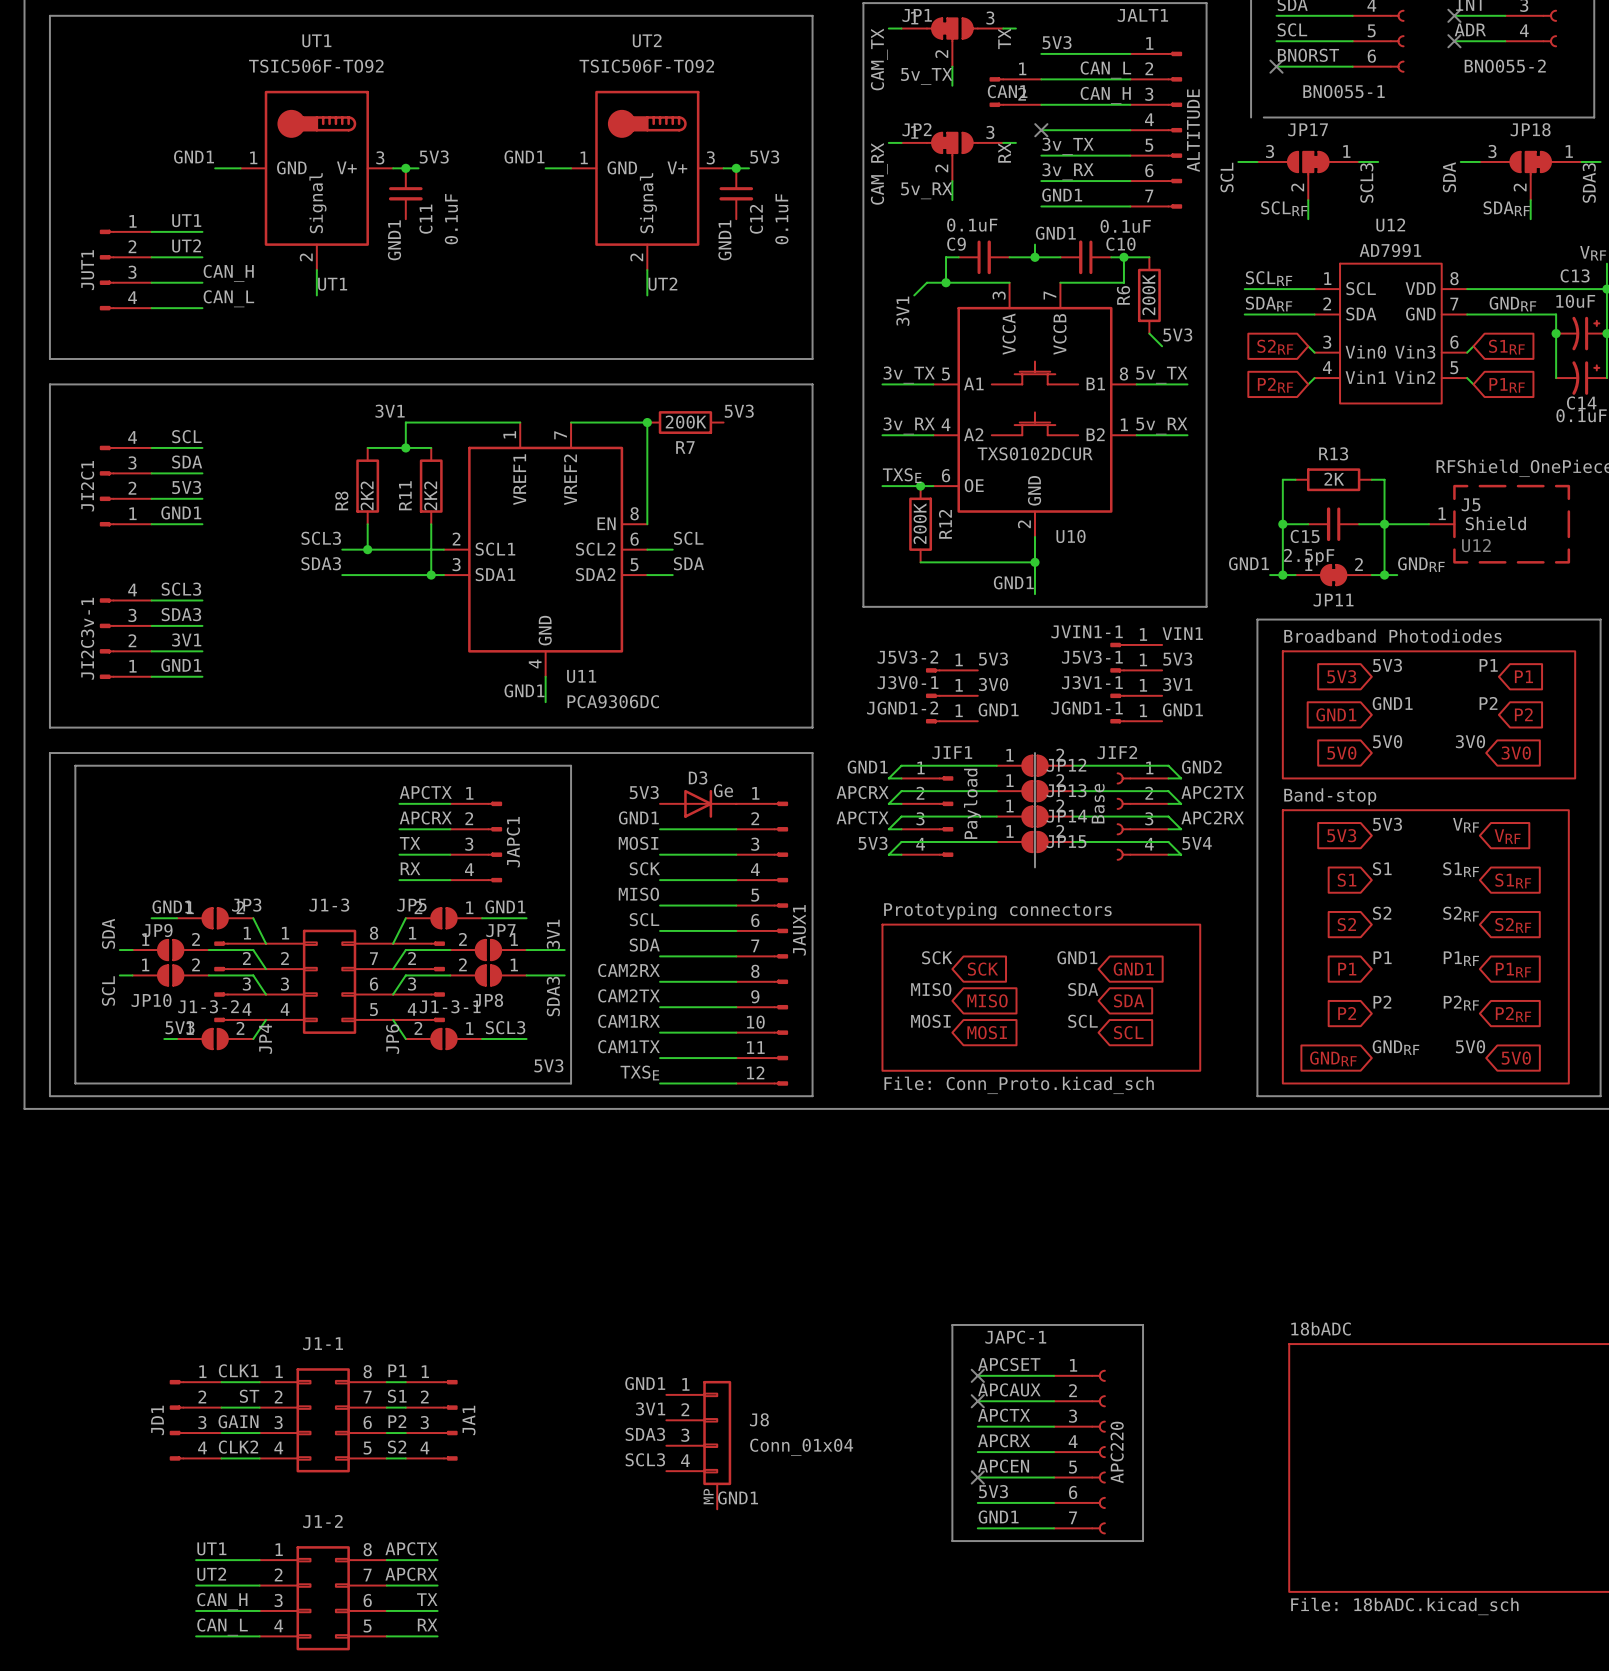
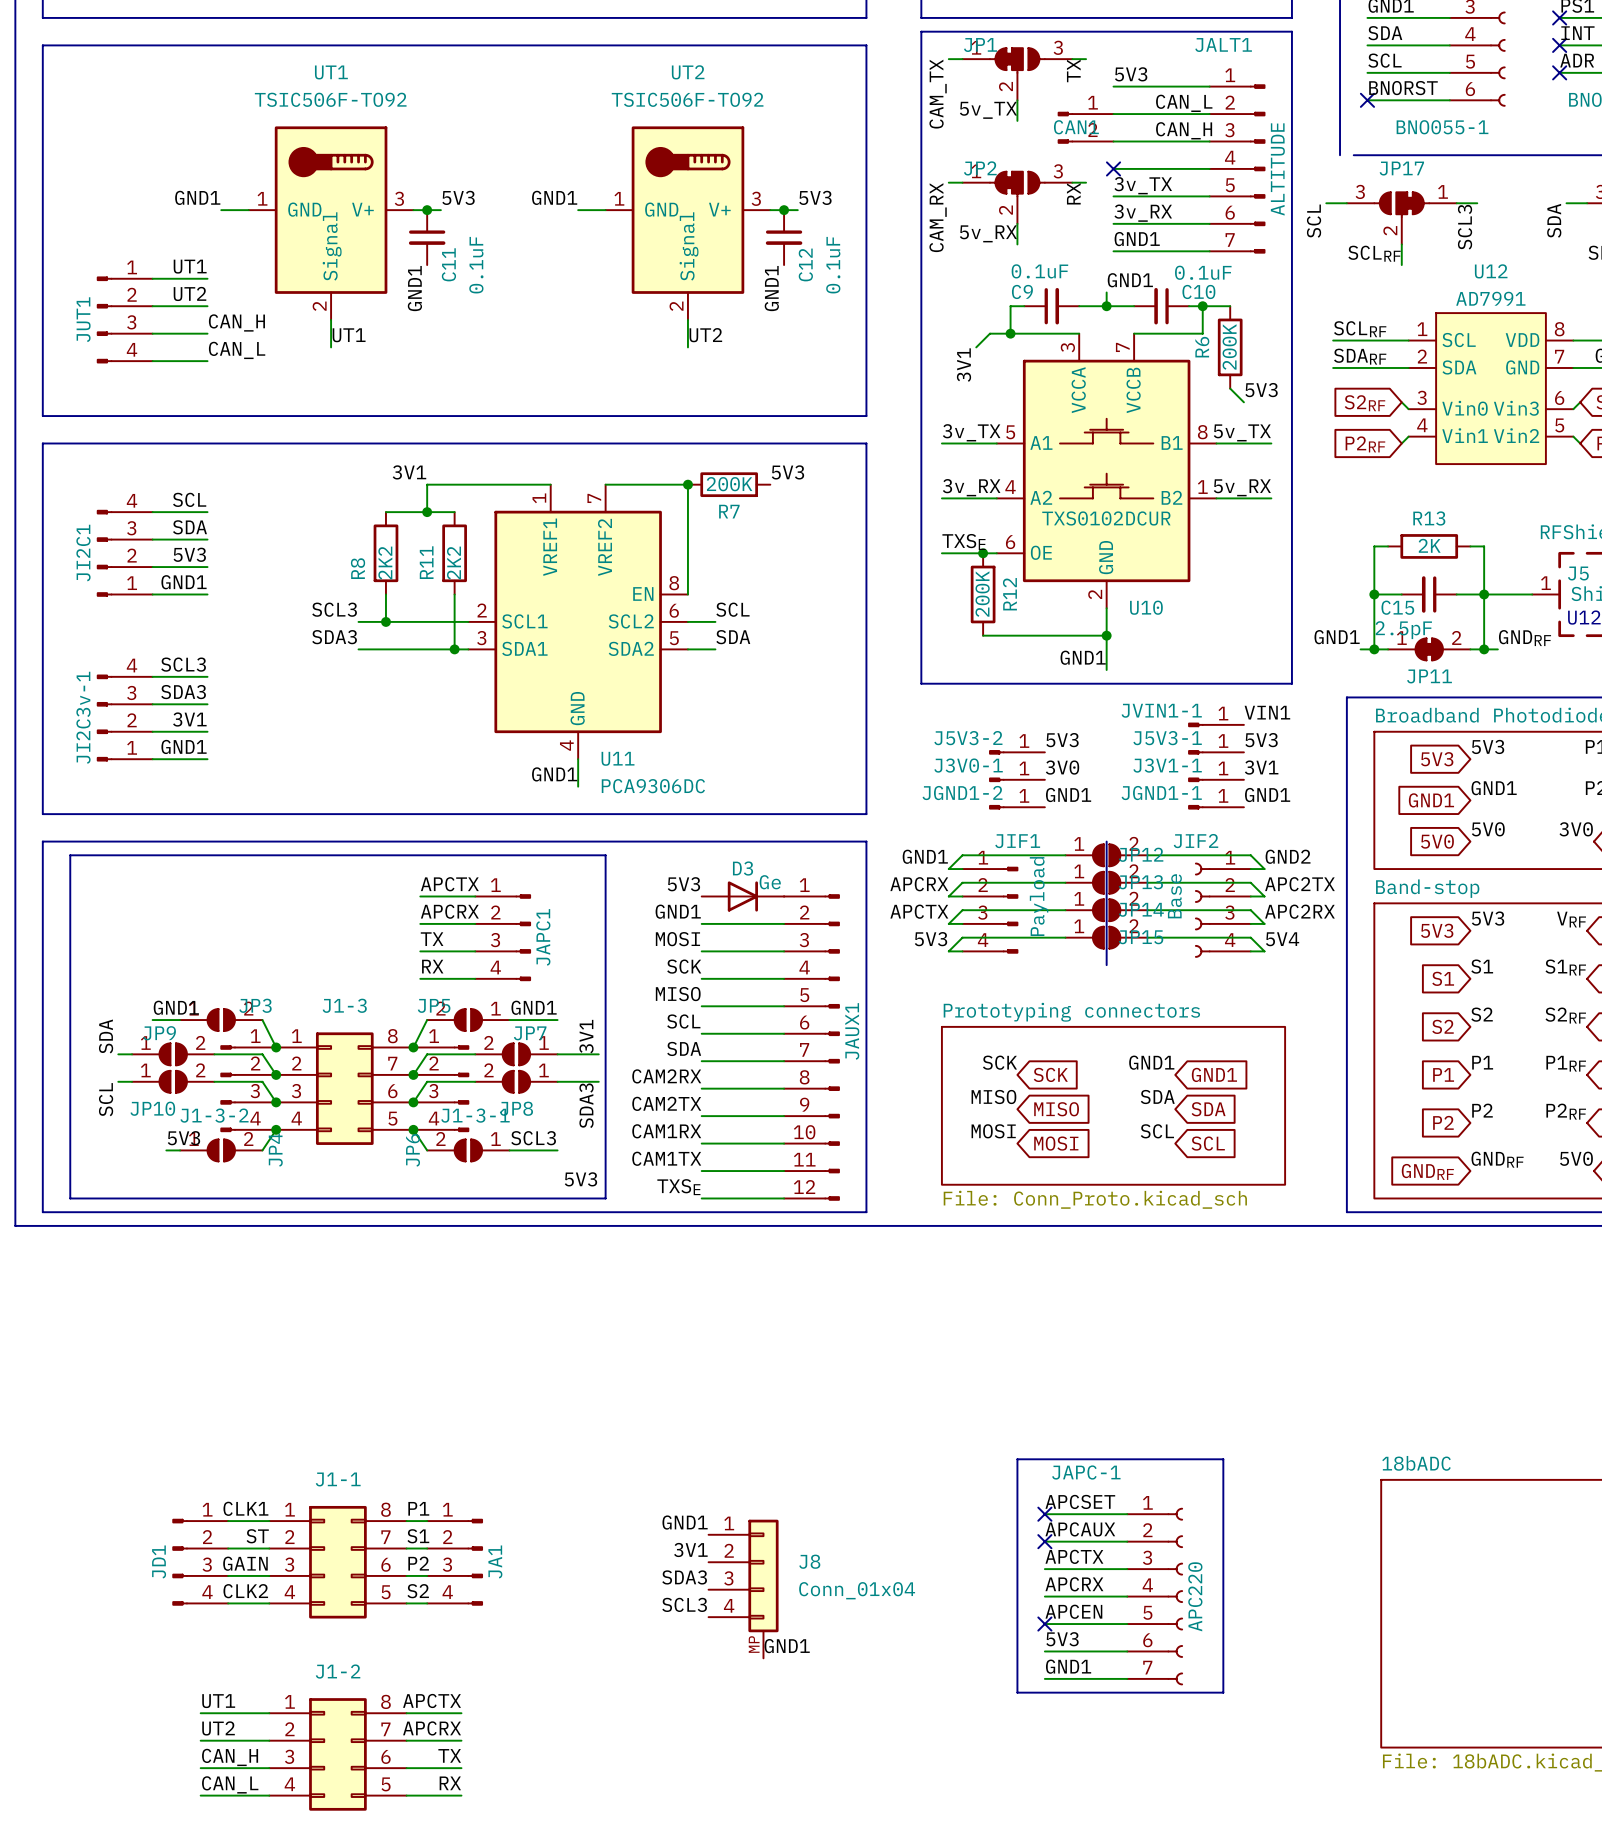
junction: none -> (276, 1047)
junction: none -> (413, 1047)
junction: none -> (276, 1074)
junction: none -> (413, 1074)
junction: none -> (276, 1102)
junction: none -> (413, 1102)
junction: none -> (276, 1129)
junction: none -> (413, 1129)

